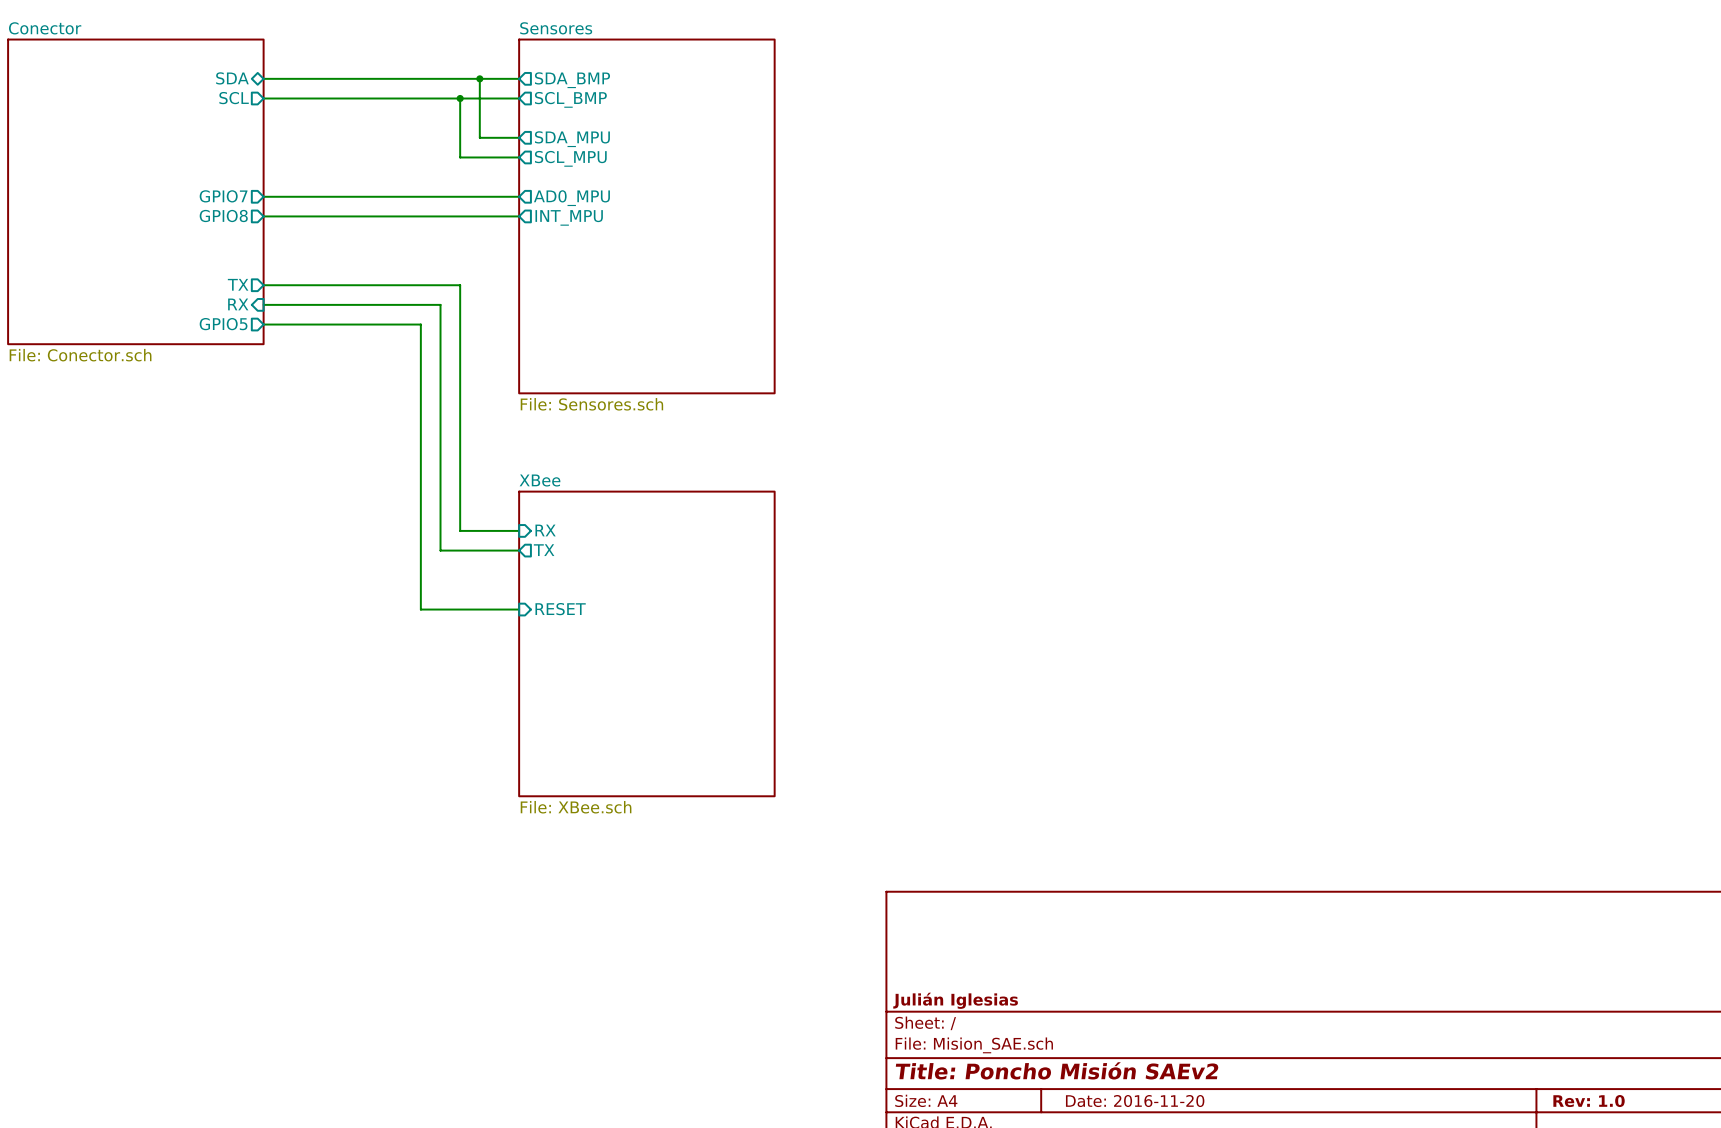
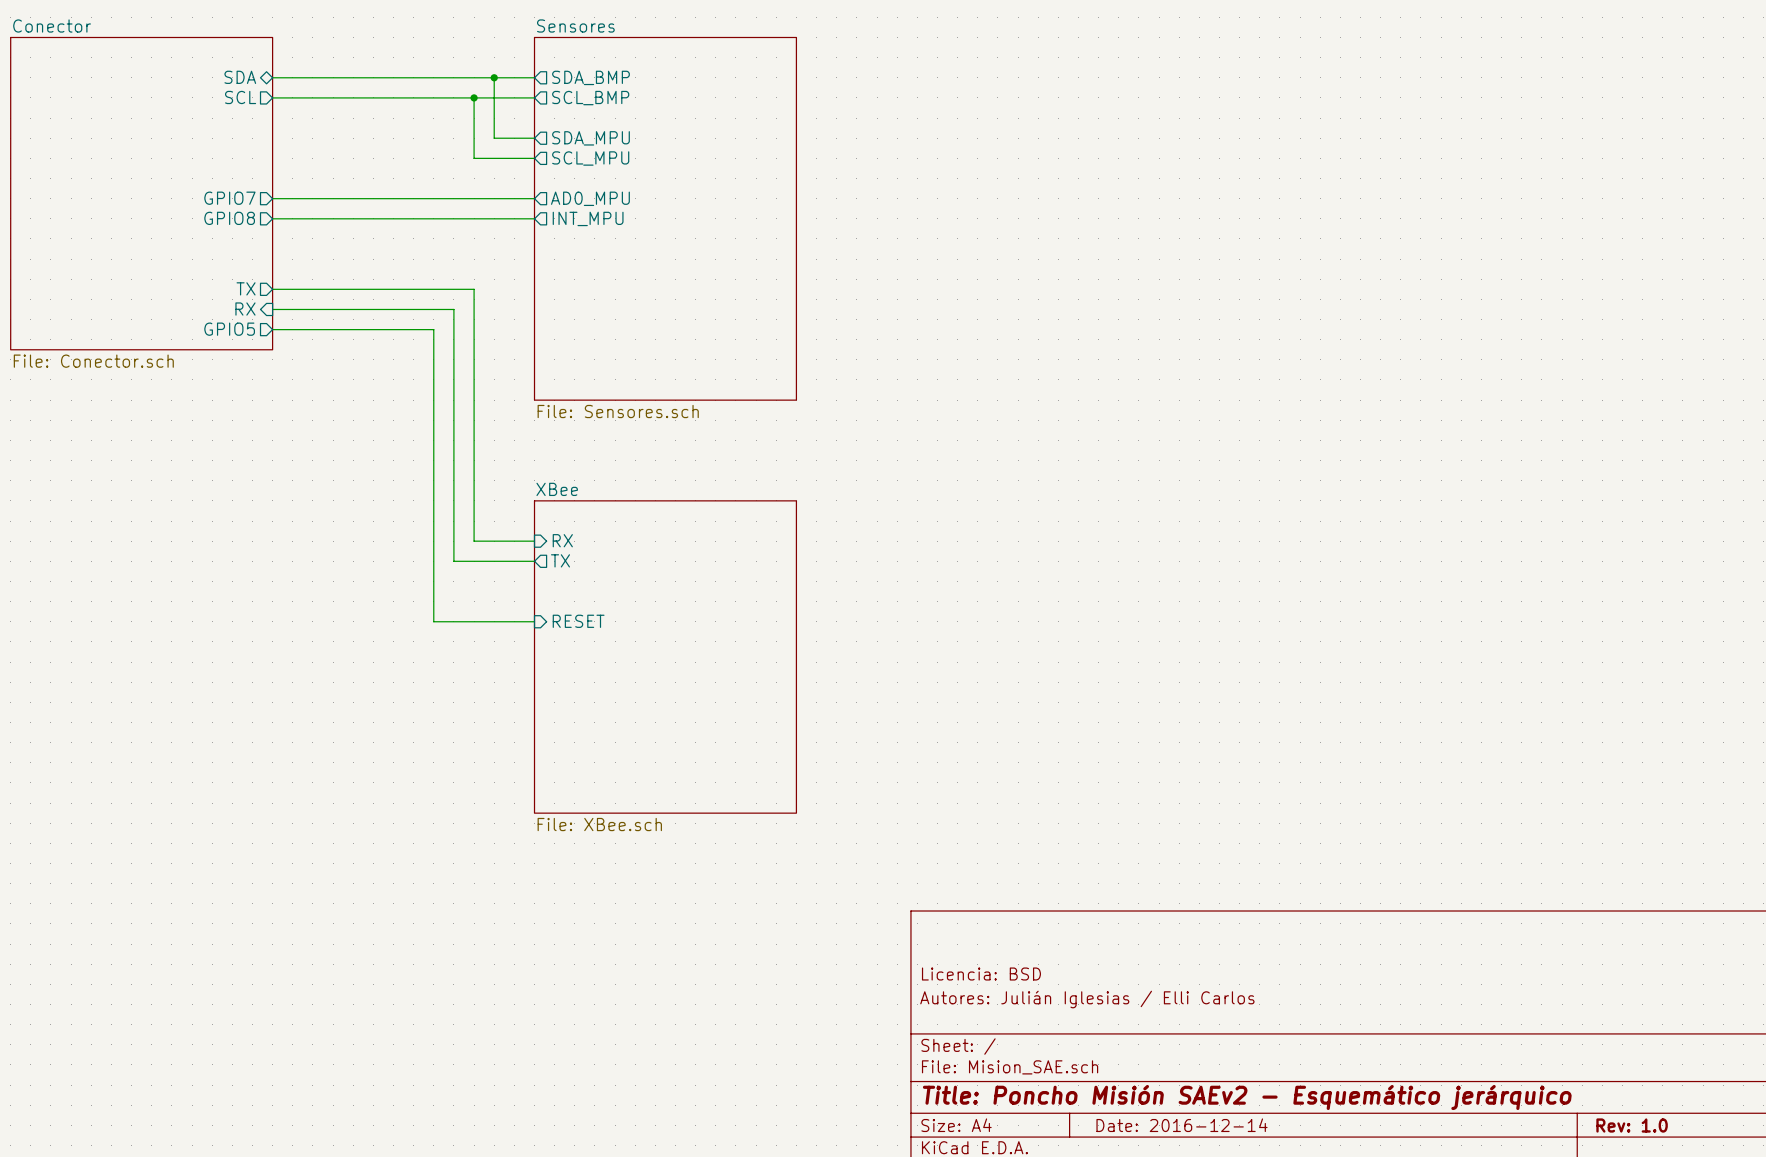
title block: none -> Licencia: BSD (981, 974)
title block: none -> Autores: Julián Iglesias / Elli Carlos (1087, 999)
title block: Julián Iglesias (955, 1000) -> none
title block: Title: Poncho Misión SAEv2 (1057, 1070) -> Title: Poncho Misión SAEv2 - Esquemático jerárquico (1247, 1097)
title block: Date: 2016-11-20 (1135, 1101) -> Date: 2016-12-14 (1182, 1125)

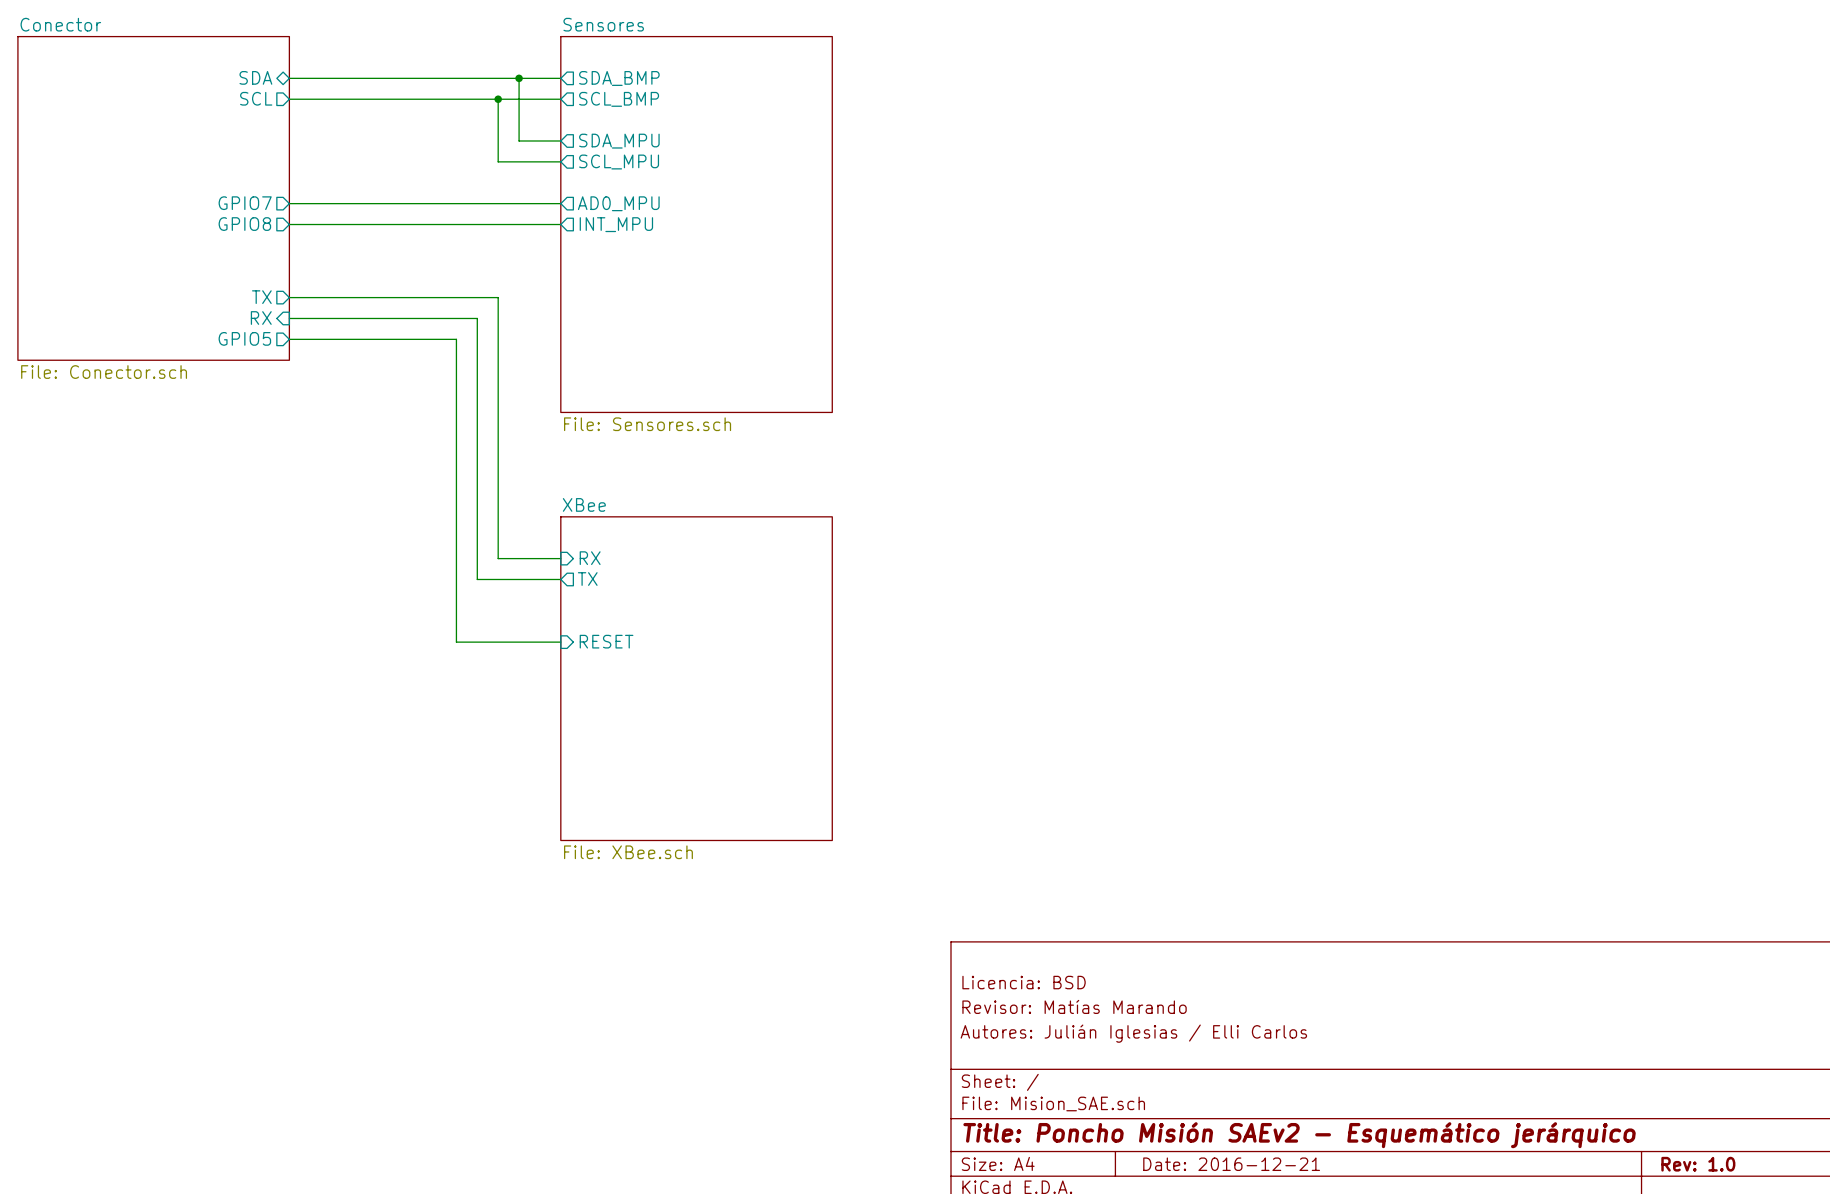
title block: none -> Licencia: BSD (1024, 982)
title block: Licencia: BSD (981, 974) -> Revisor: Matías Marando (1074, 1006)
title block: Date: 2016-12-14 (1182, 1125) -> Date: 2016-12-21 (1231, 1164)

